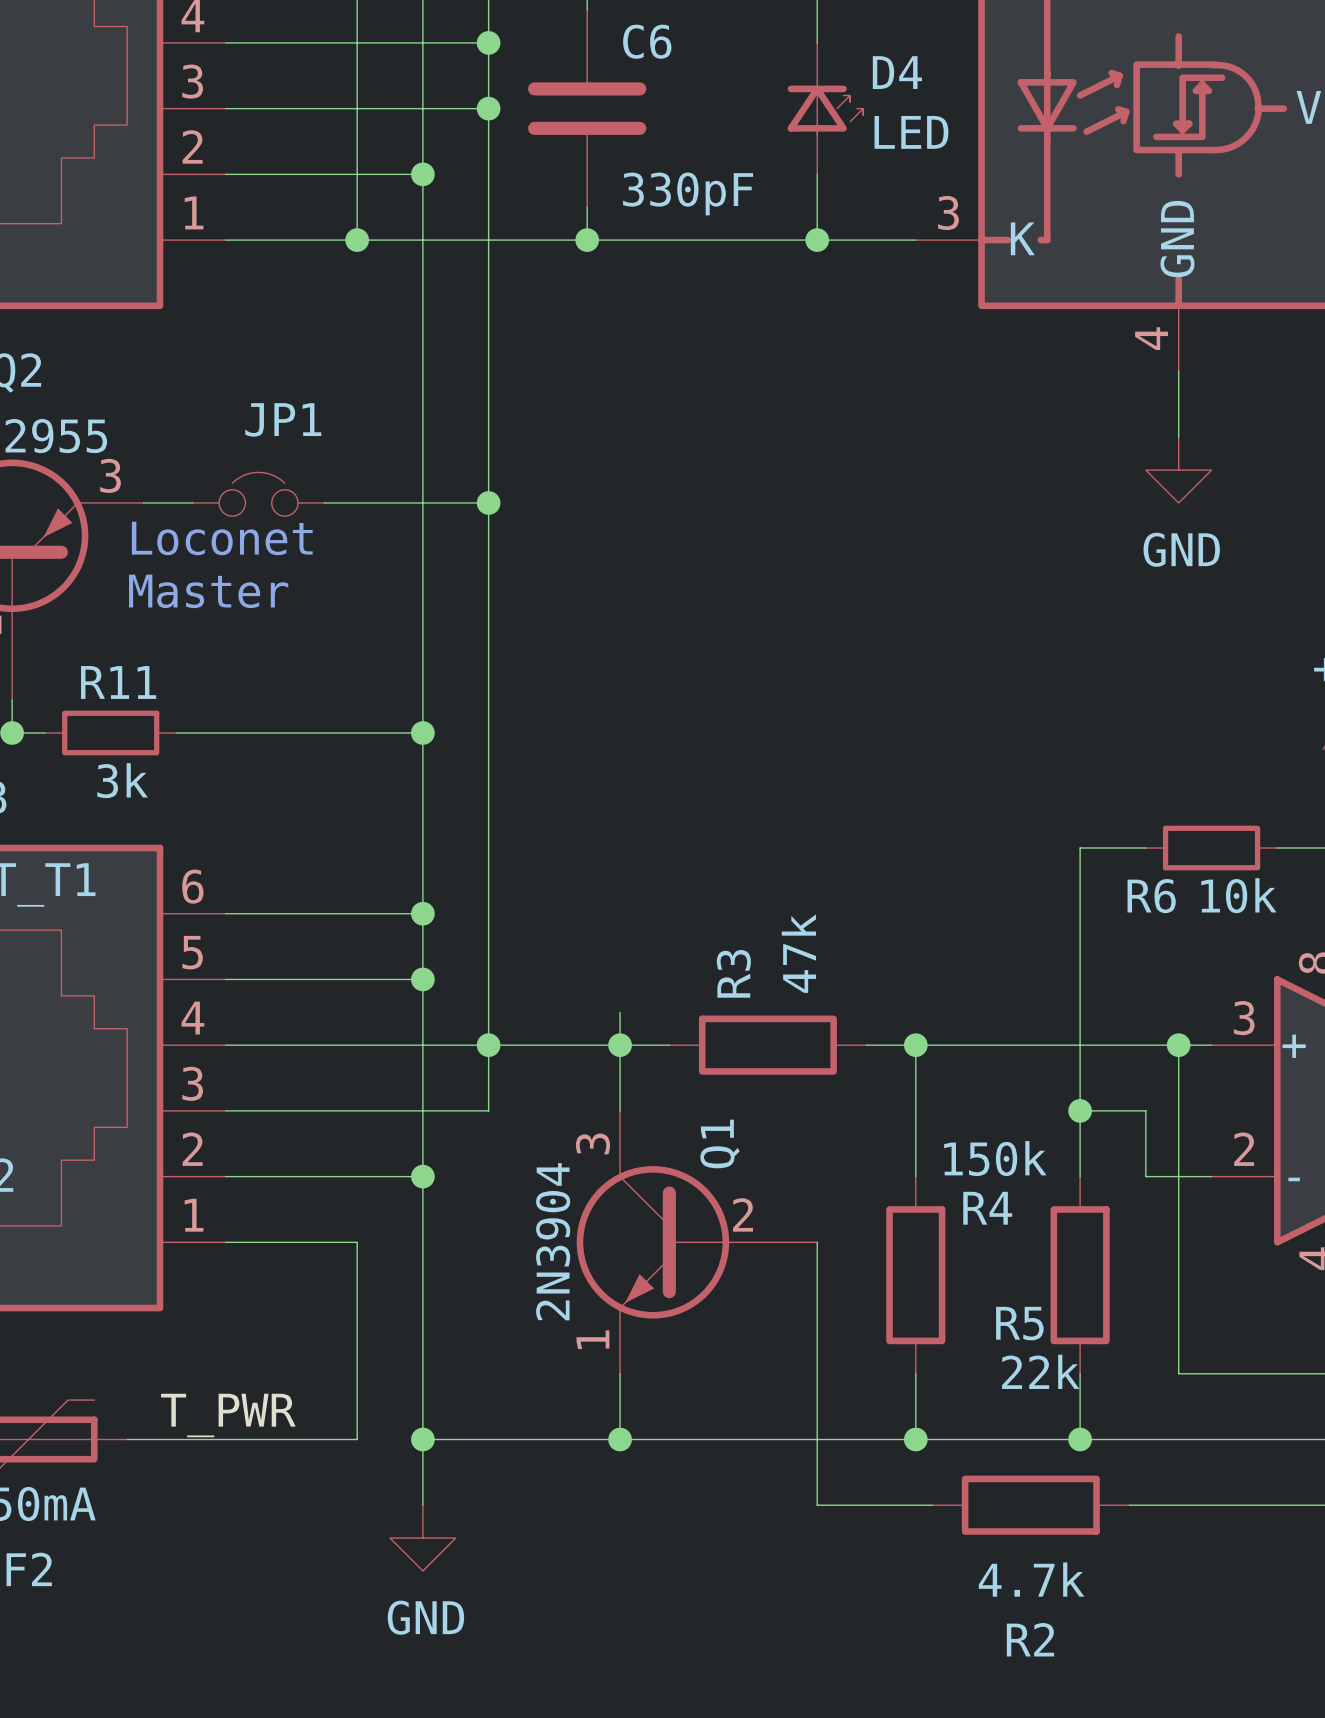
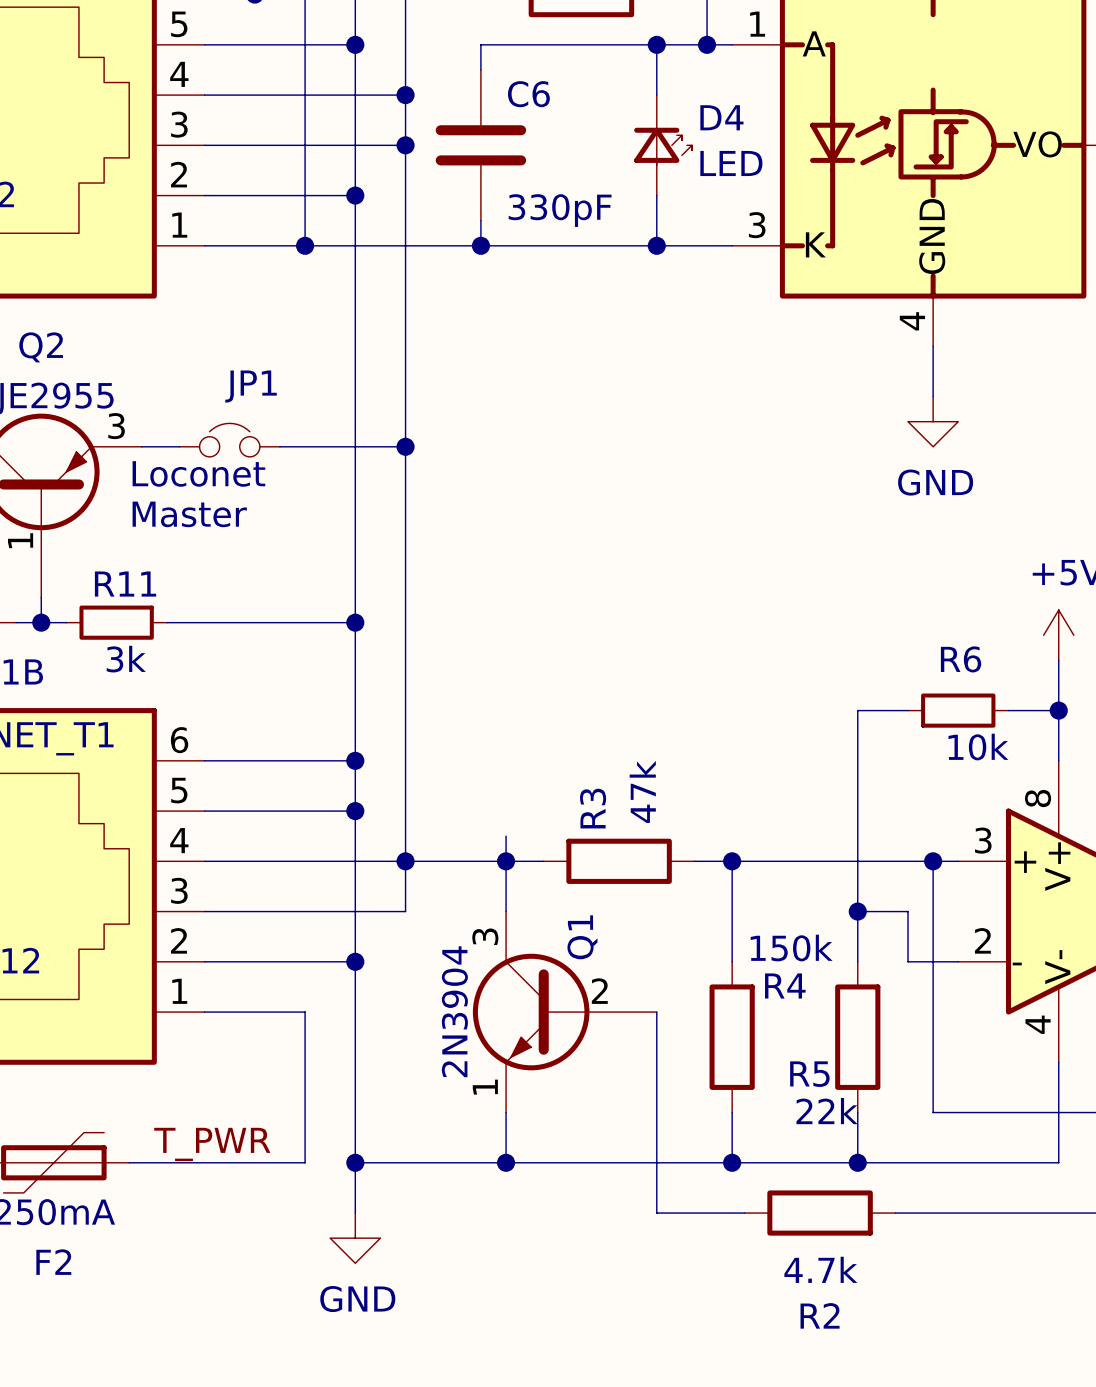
R6 name position: R6 (1151, 896) -> R6 (961, 659)

